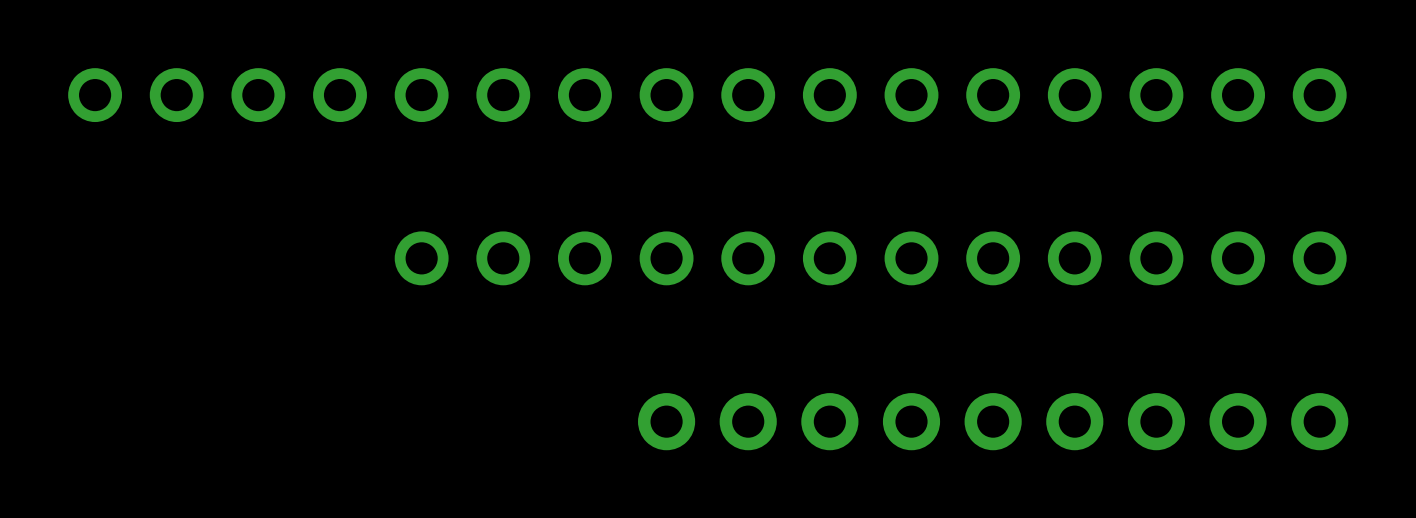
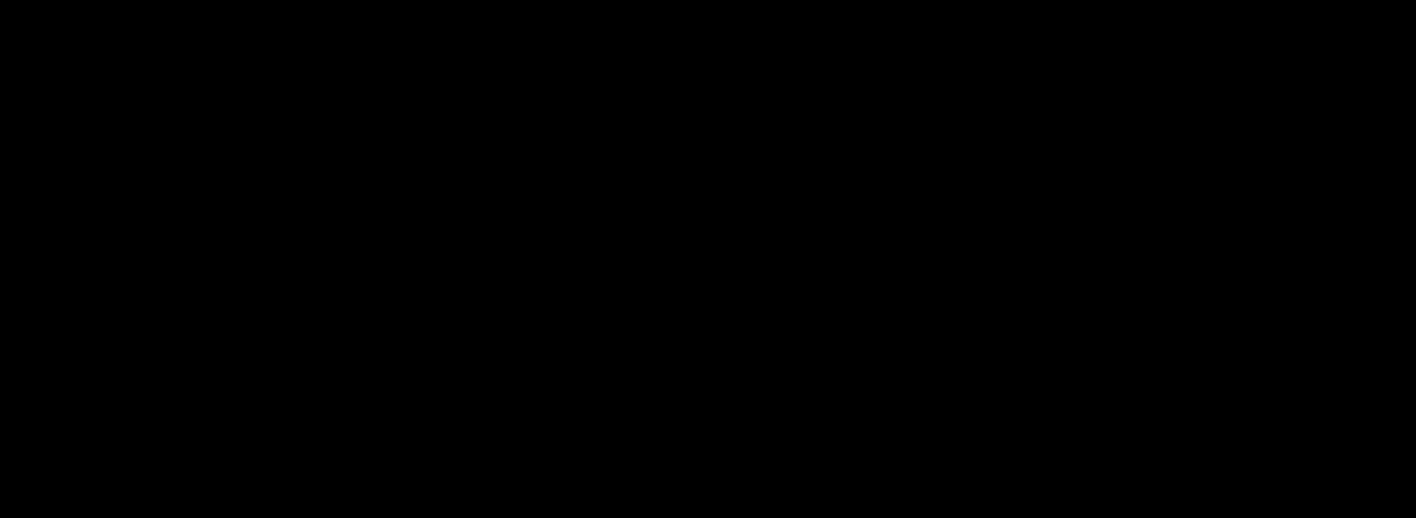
part: (707, 95) -> none
part: (870, 258) -> none
part: (993, 421) -> none

